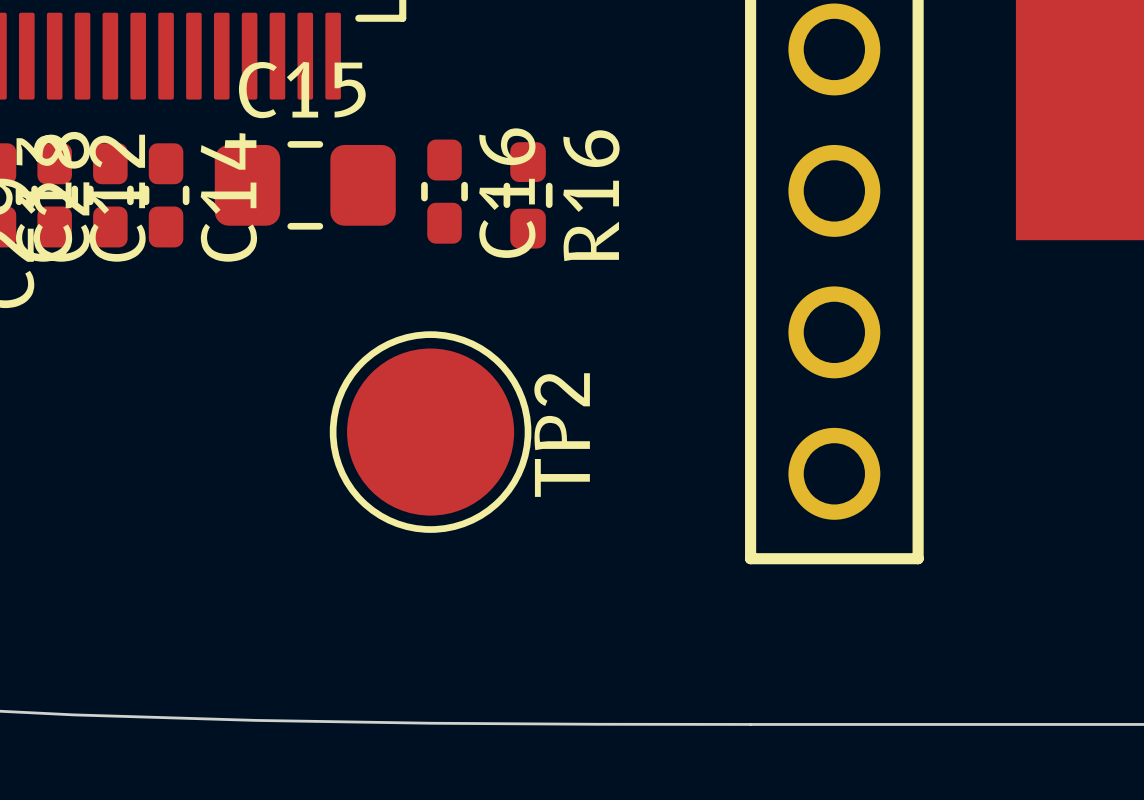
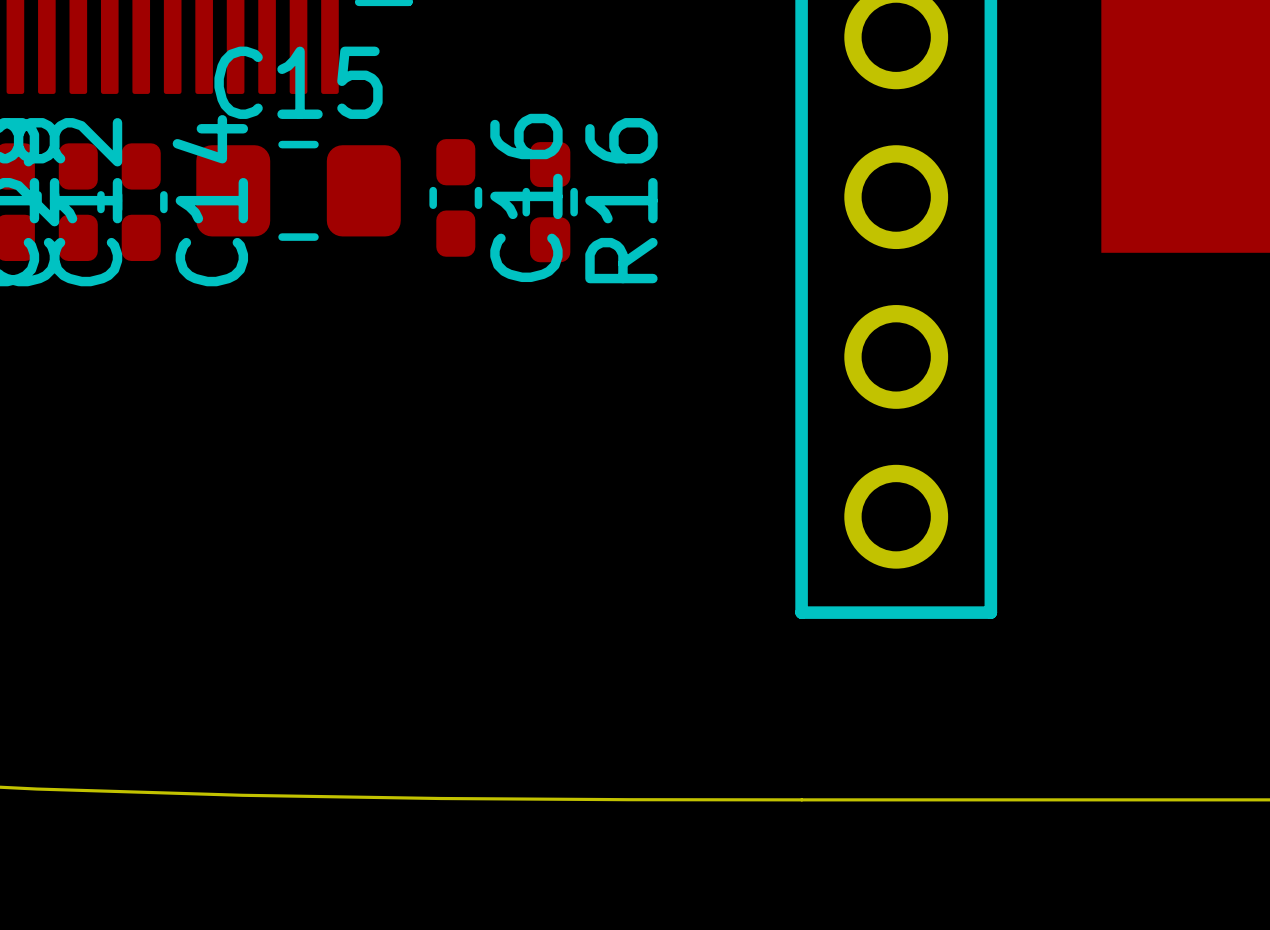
TP2: (430, 432) -> none

